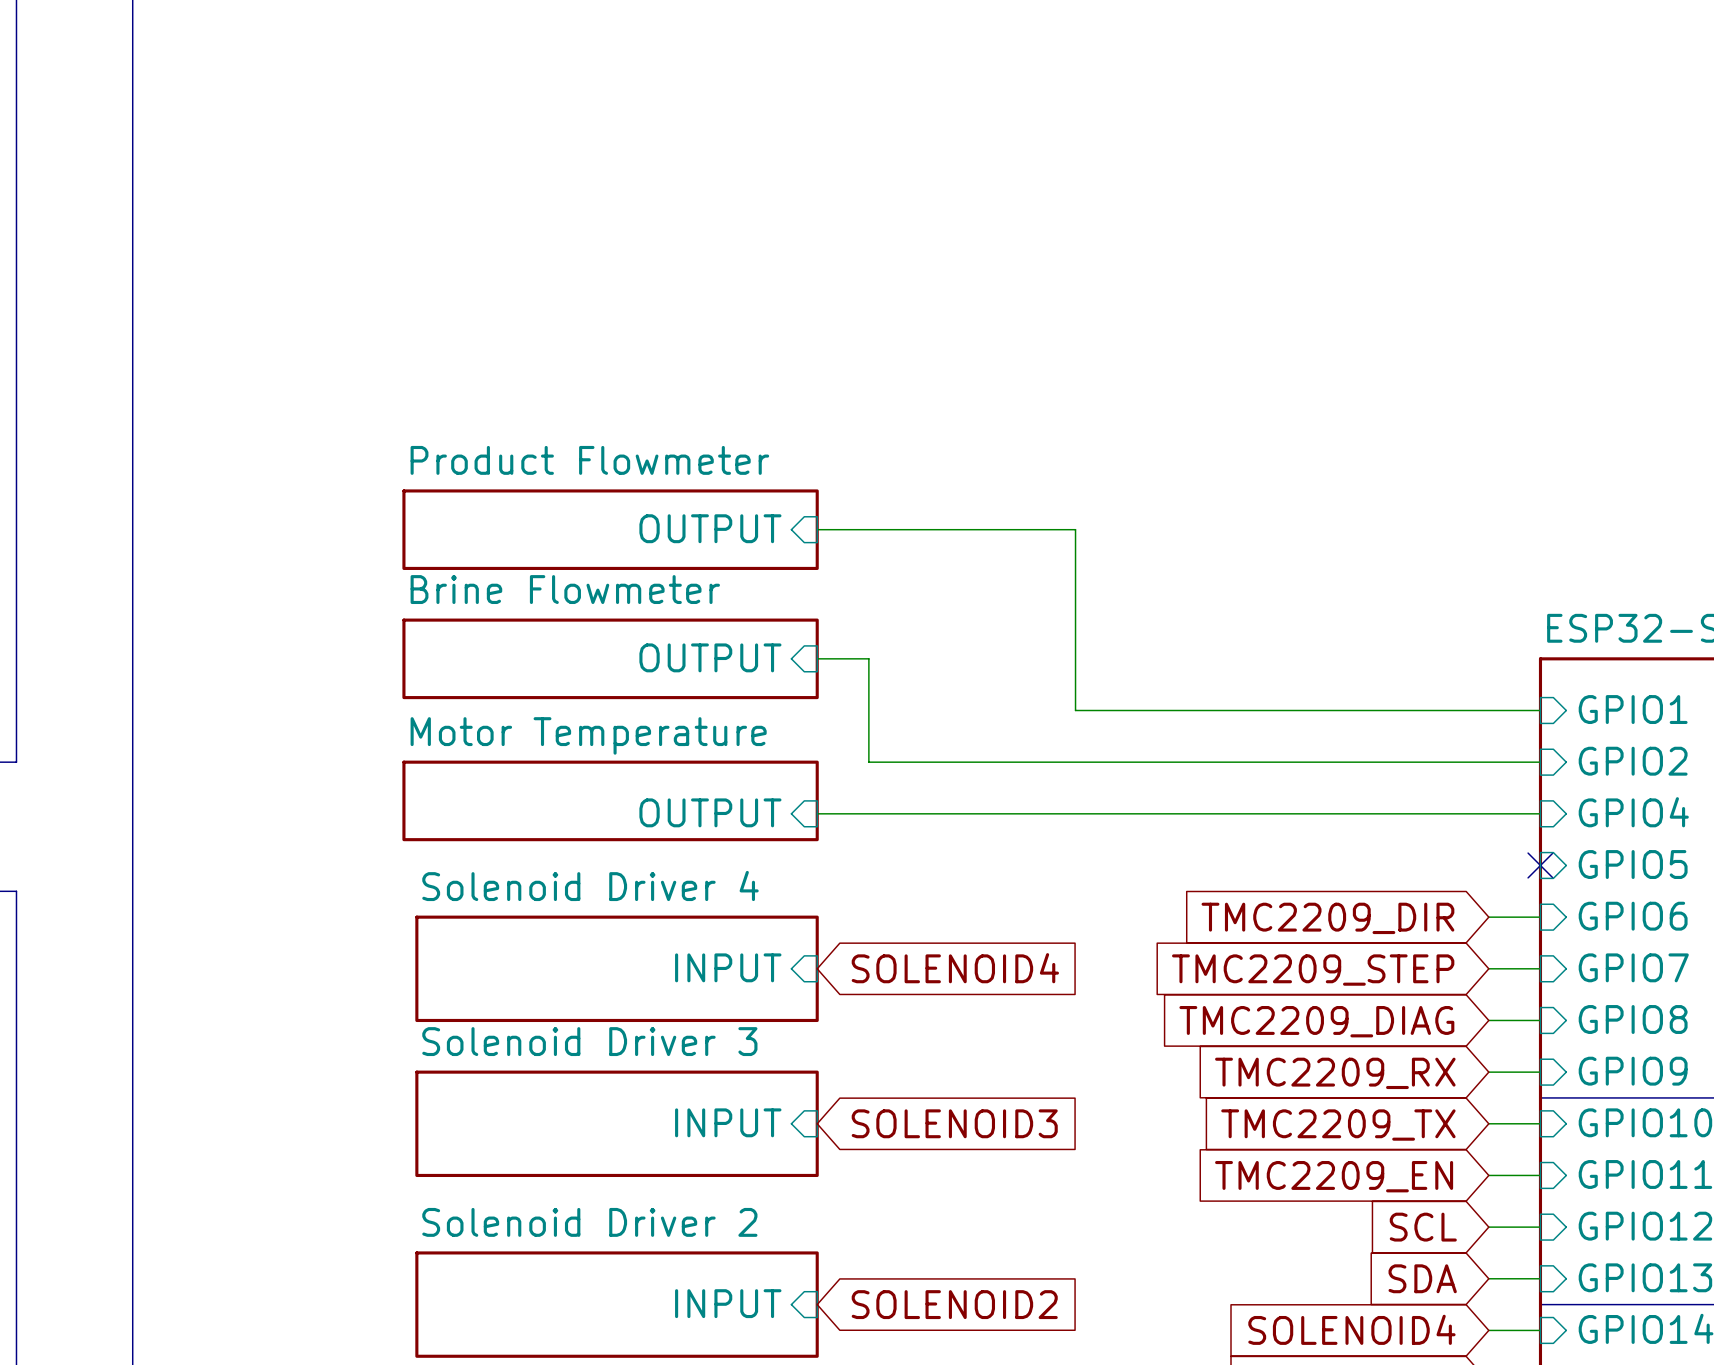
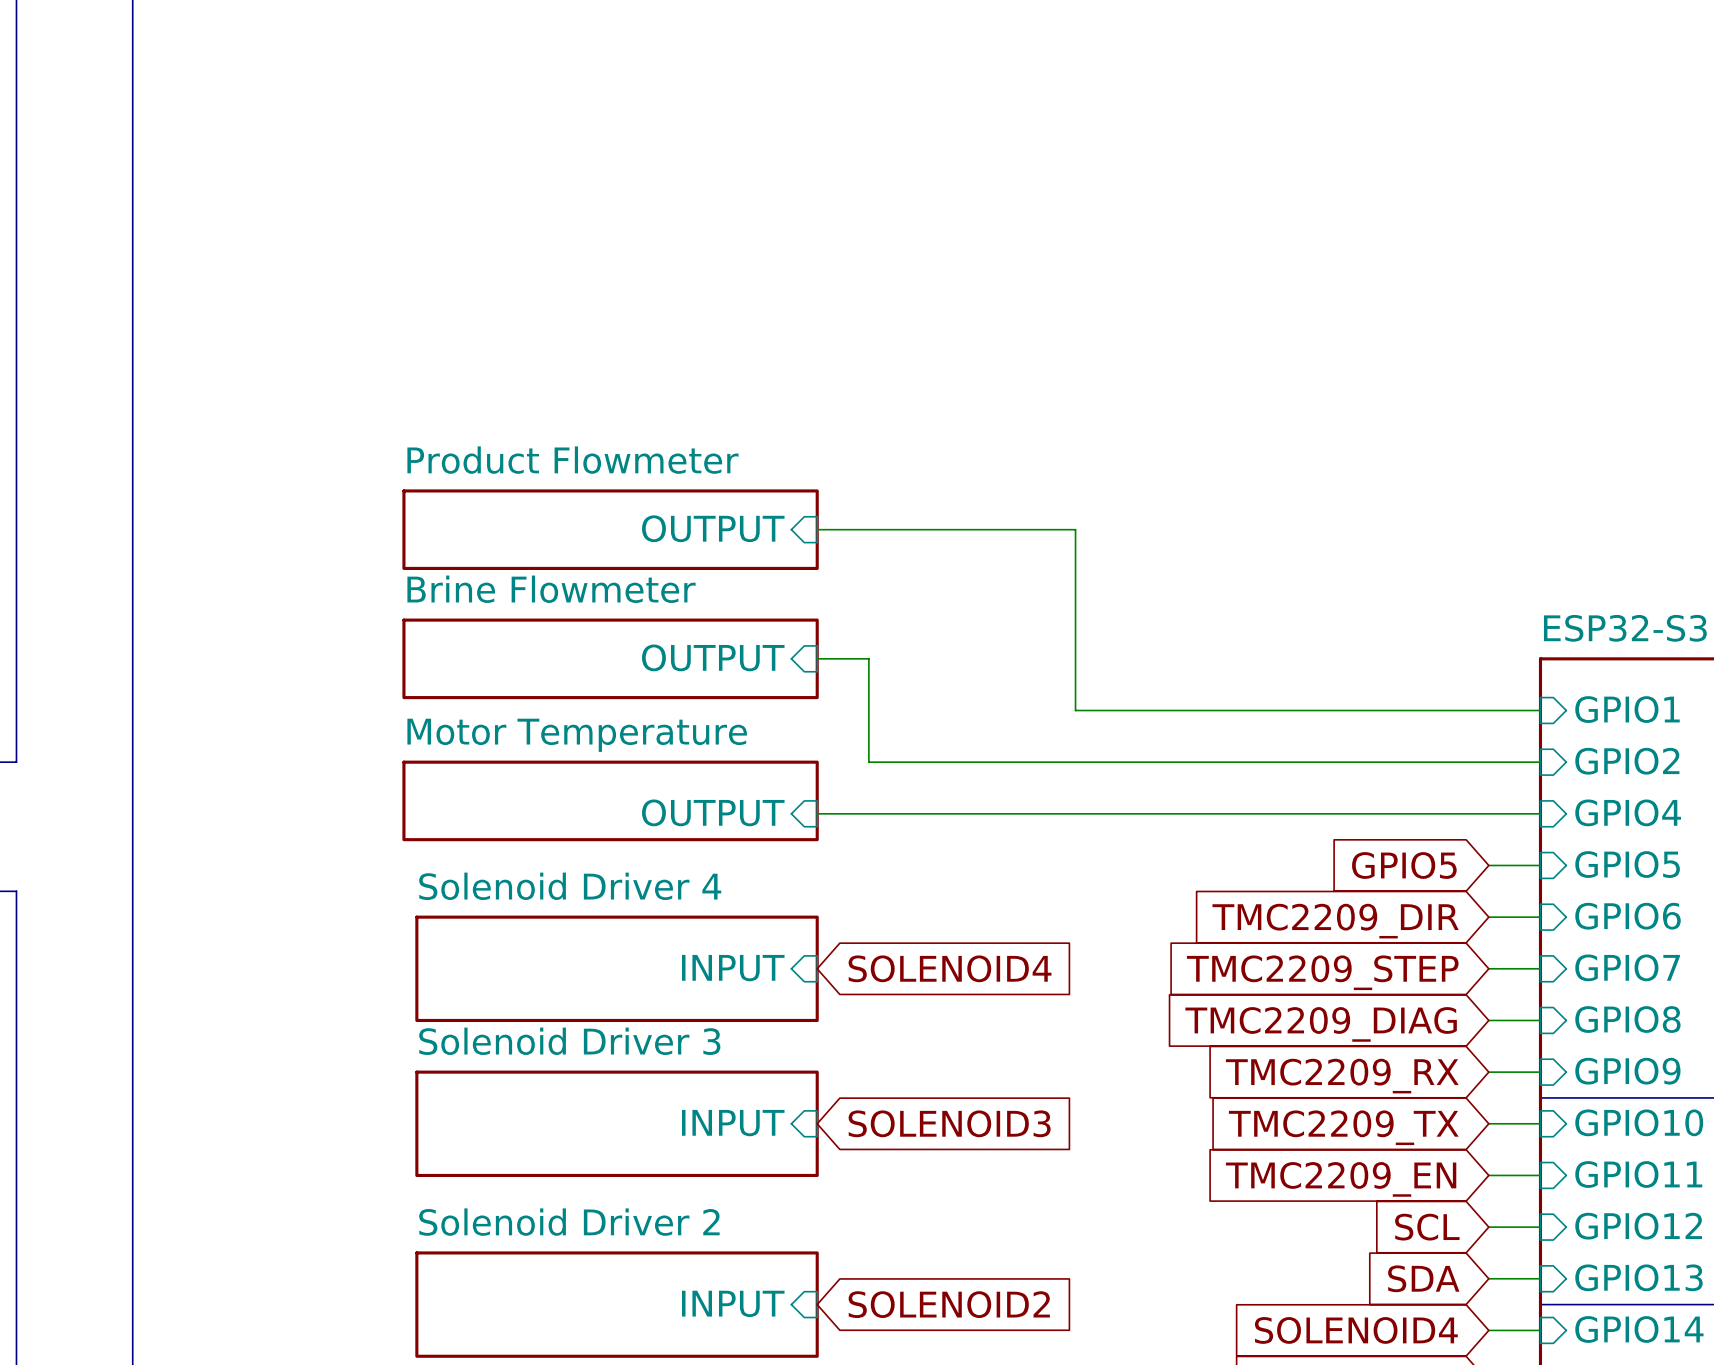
global label: none -> GPIO5 (1404, 865)
wire: none -> (1488, 865) (1540, 865)
no-connect mark: (1540, 865) -> none

